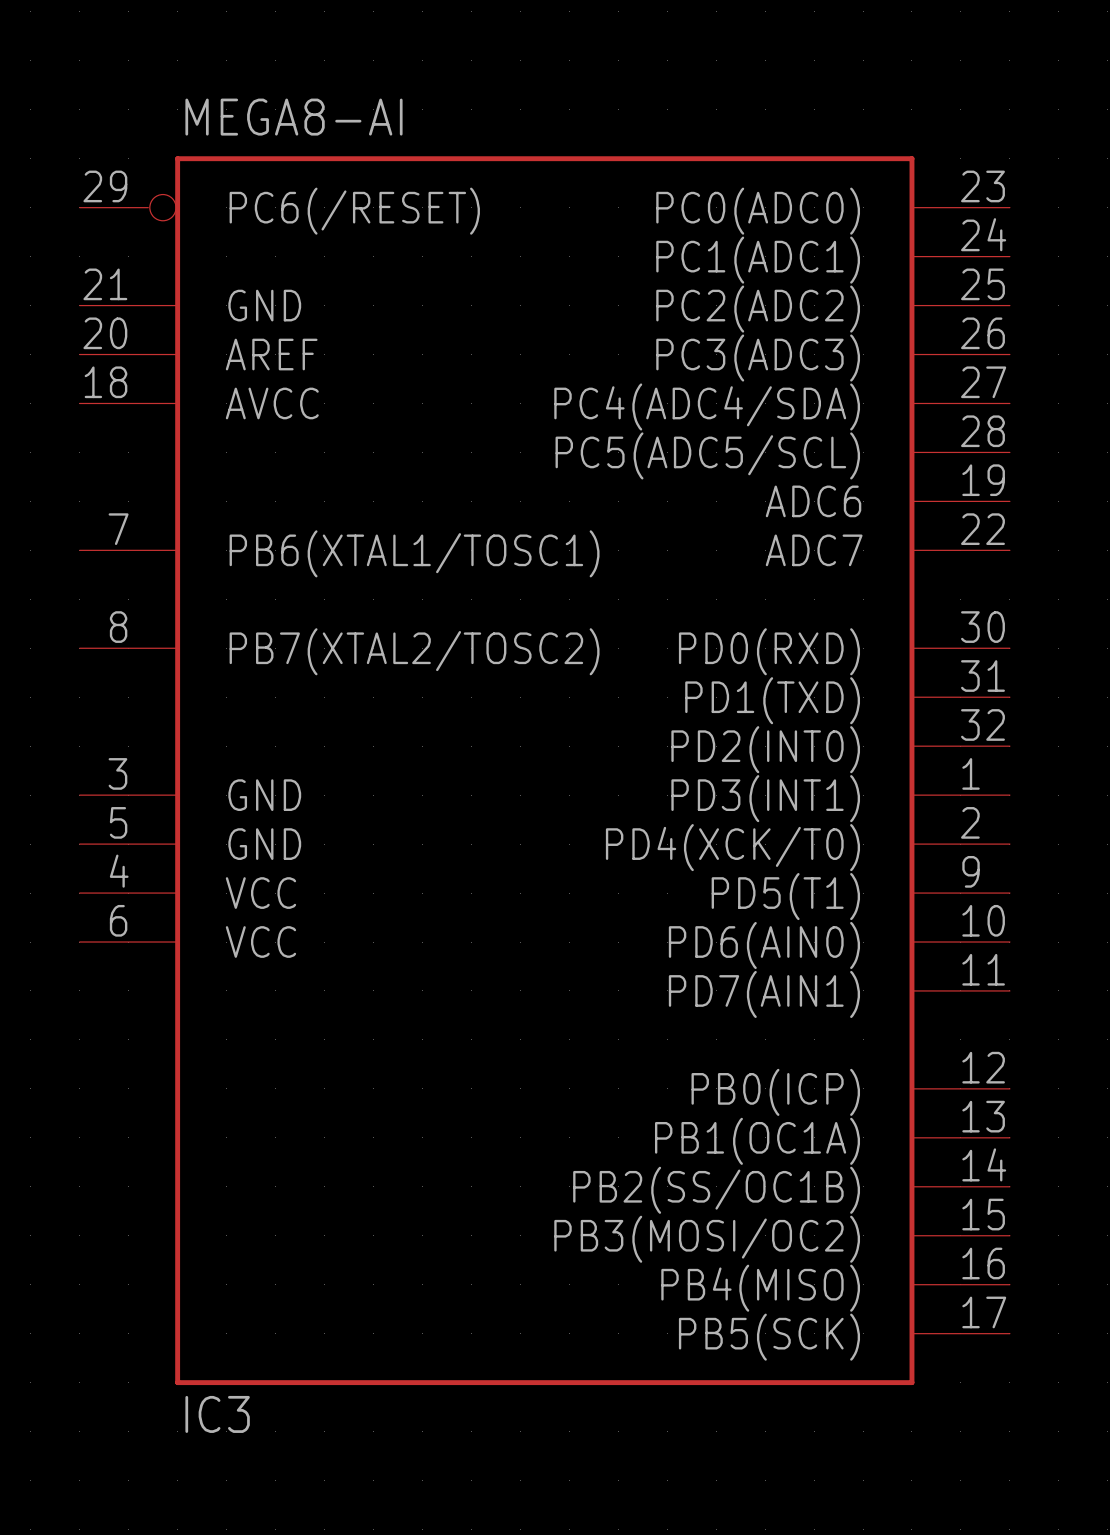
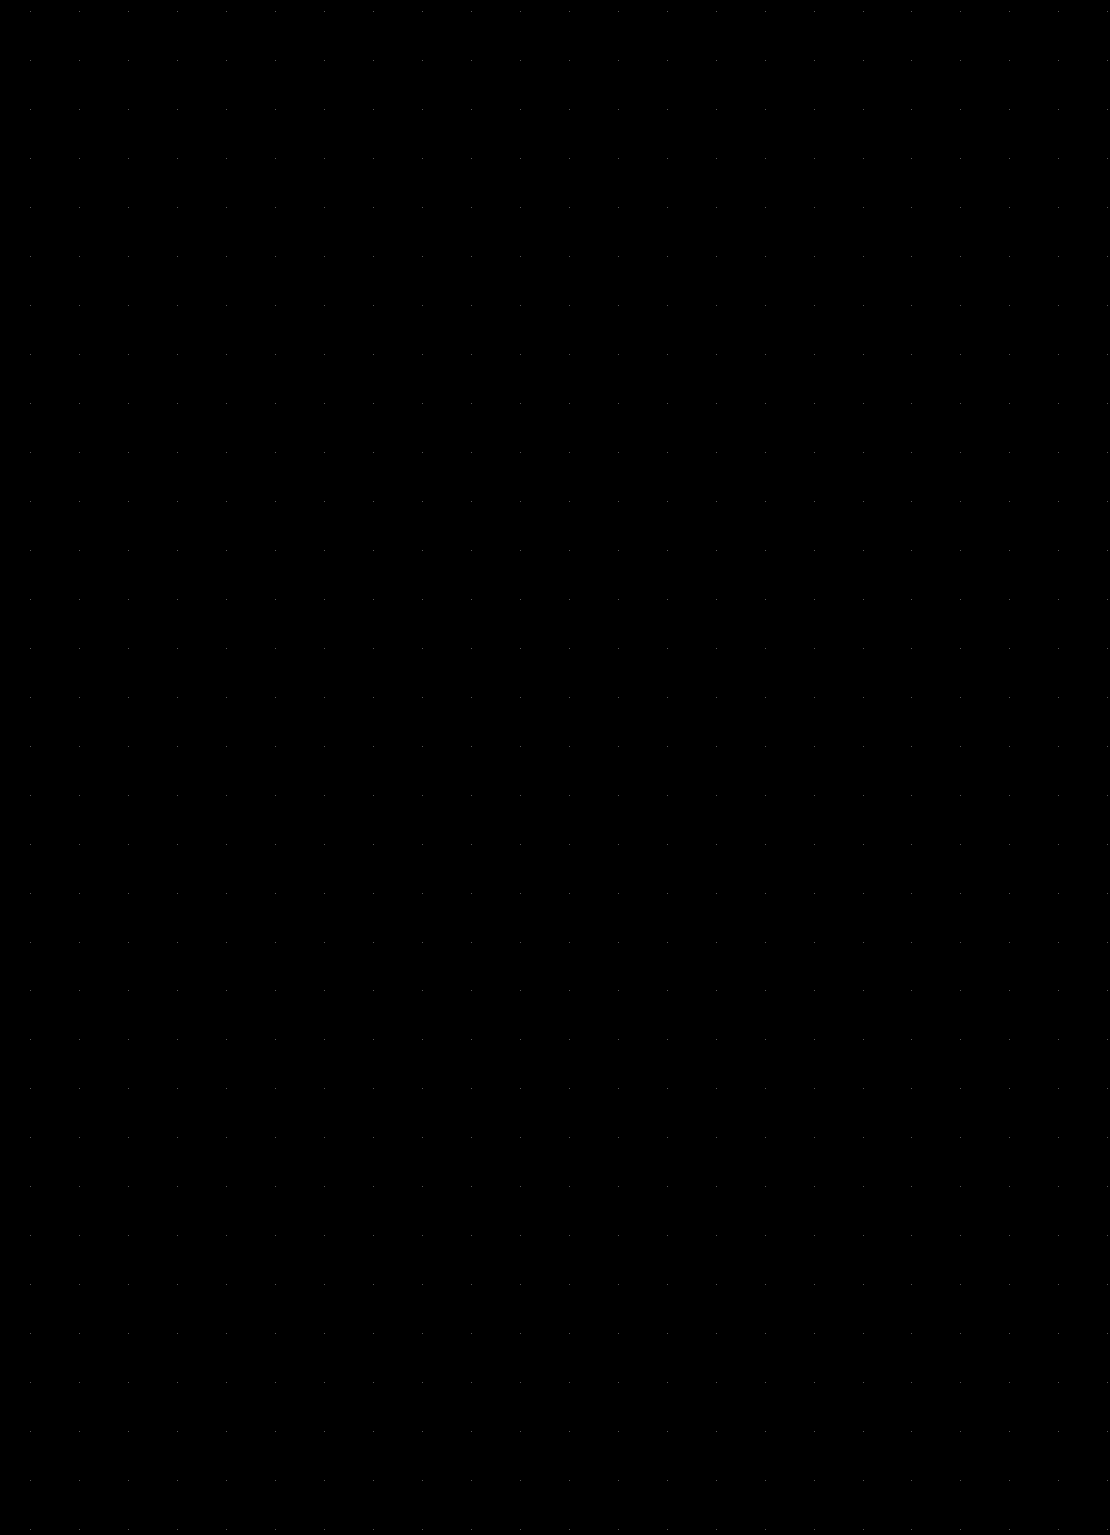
IC3: MEGA8-AI (544, 770) -> none

